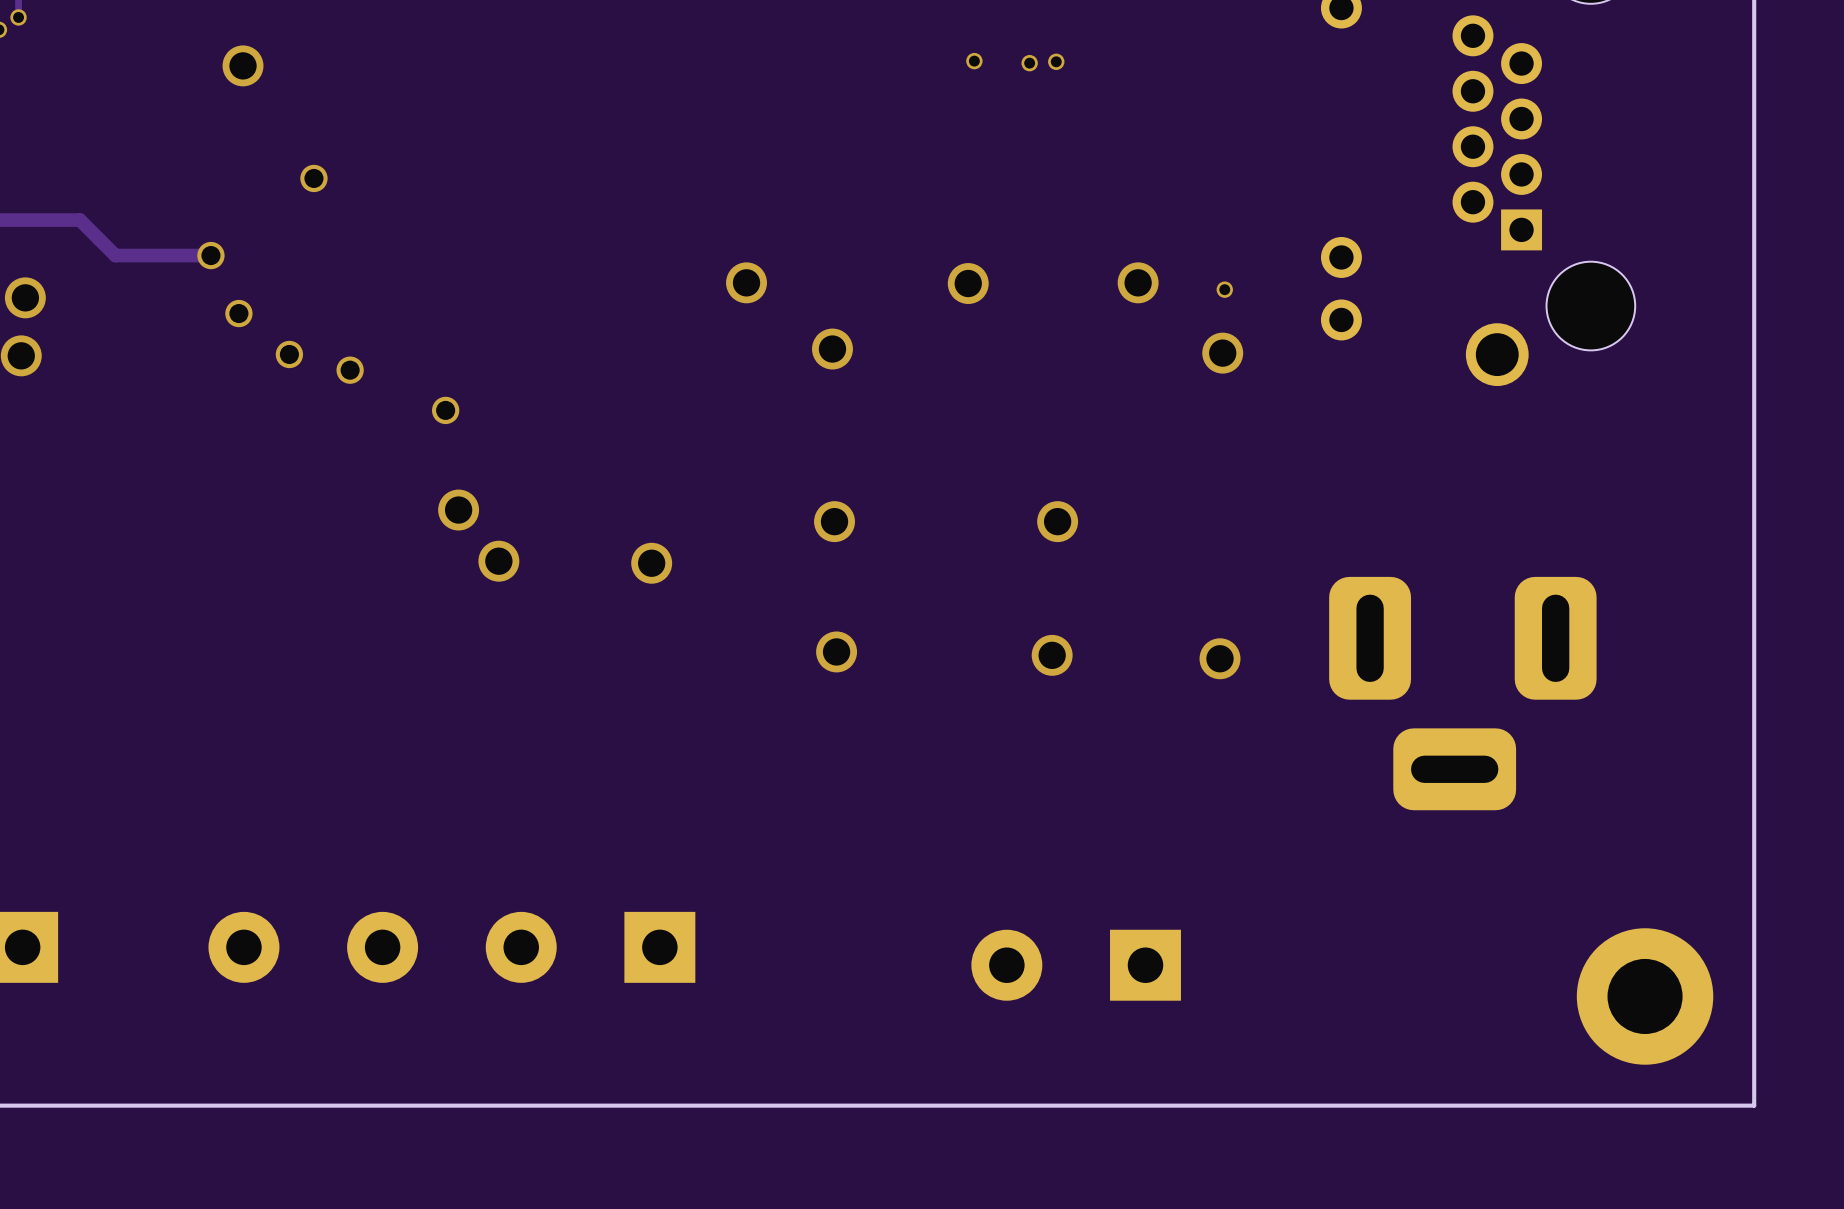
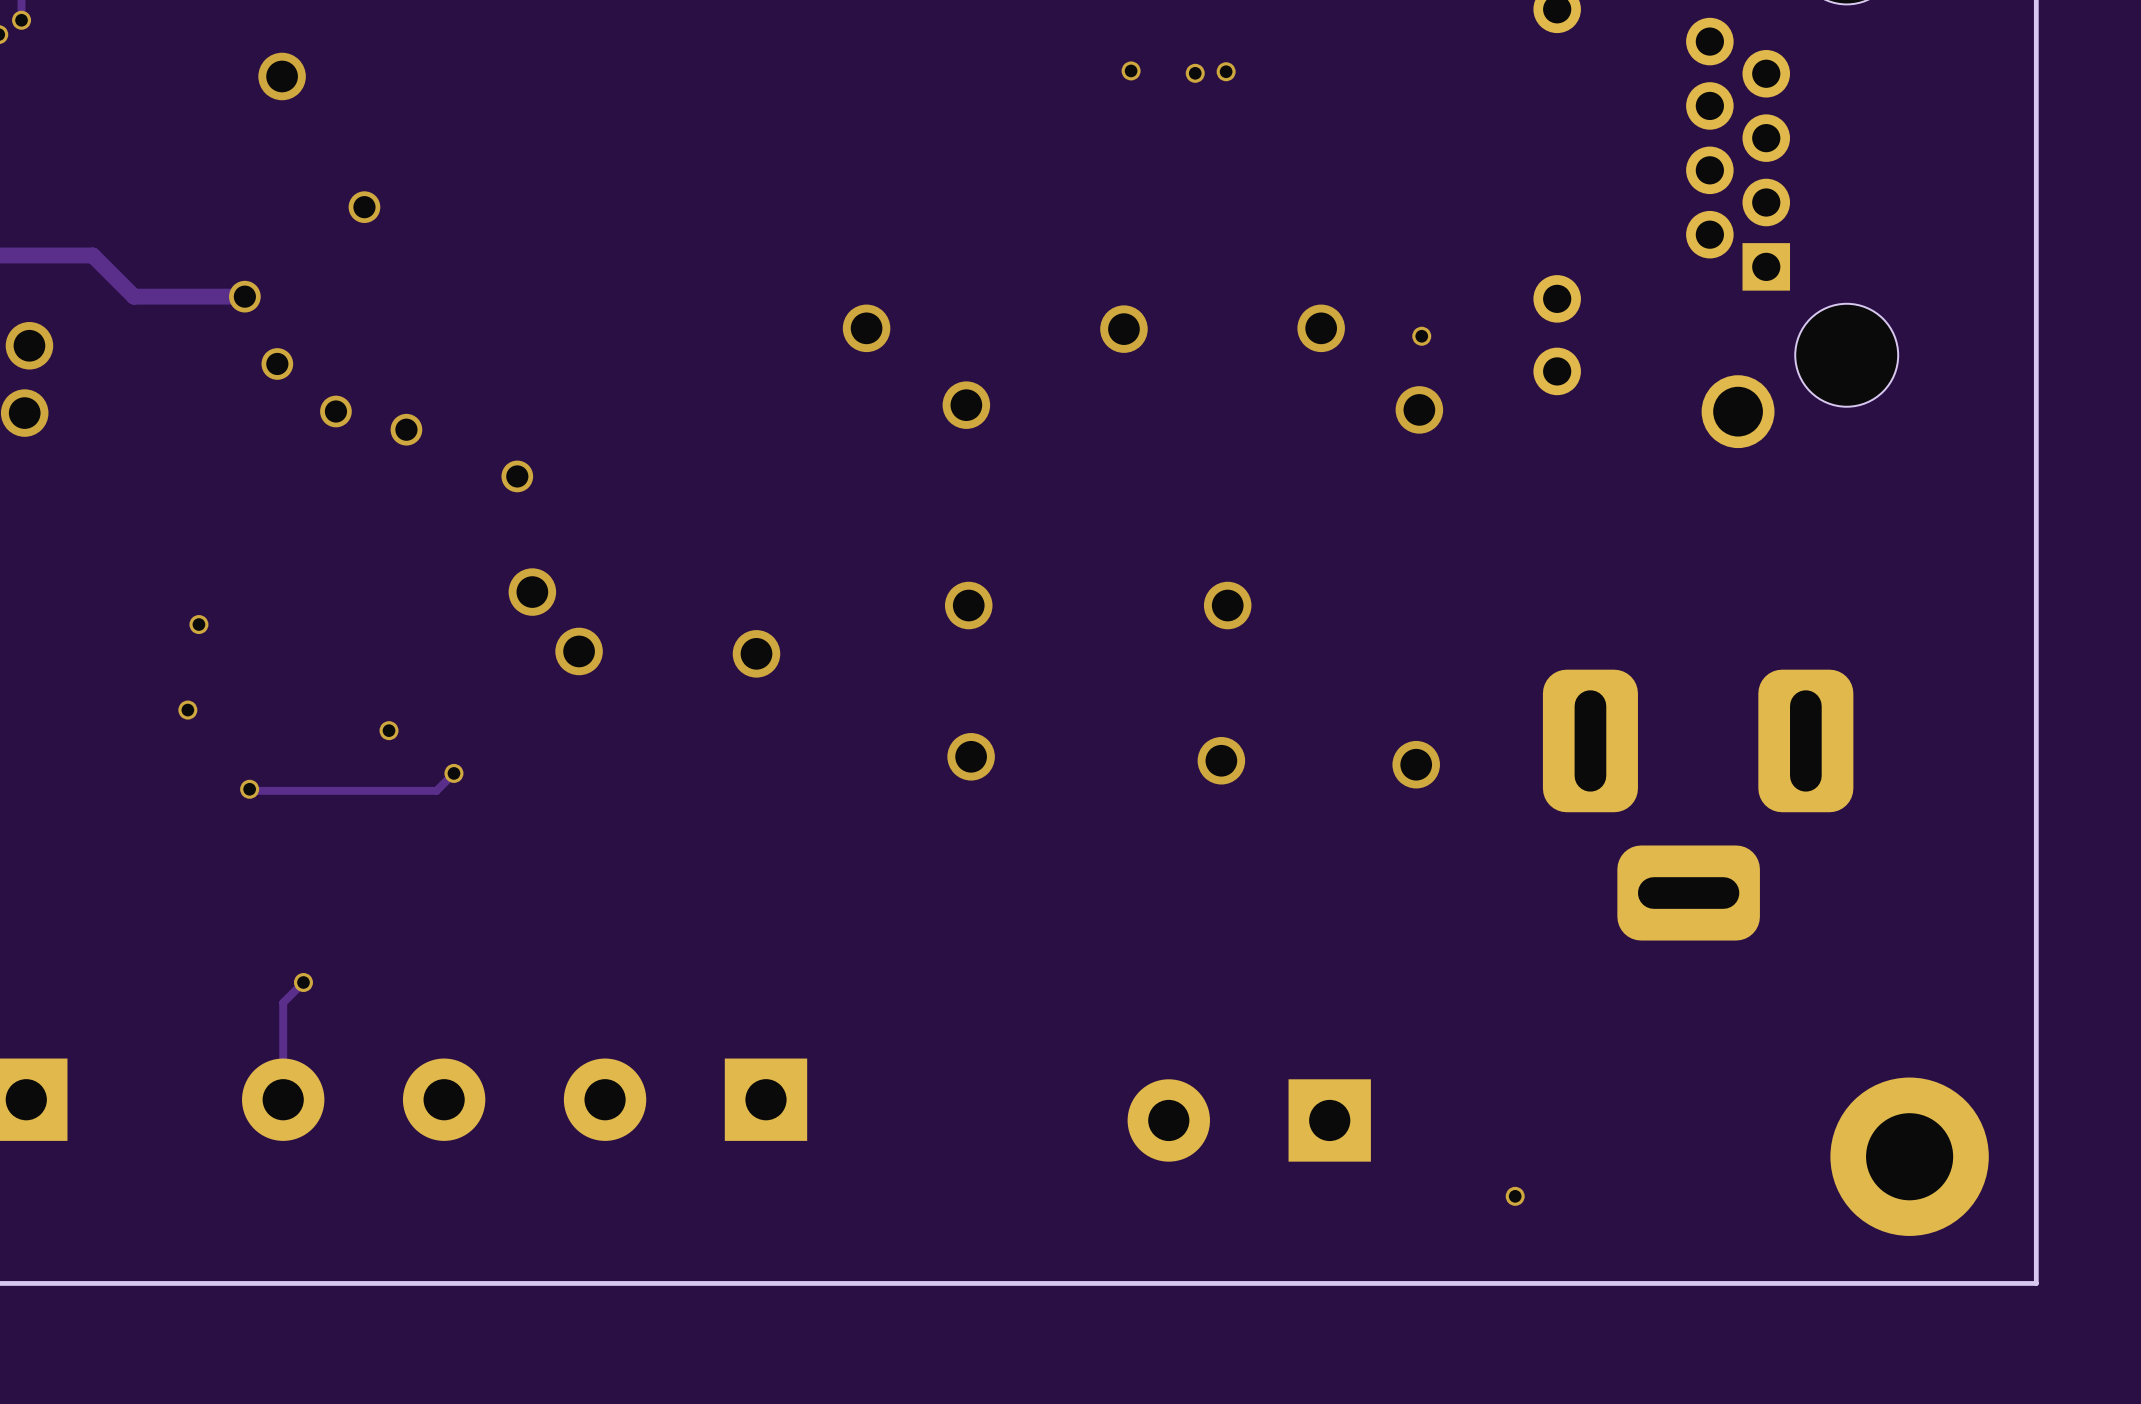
via: none -> (198, 624)
via: none -> (187, 710)
via: none -> (389, 730)
track: none -> (453, 773) (436, 790) (251, 790) (249, 789)
via: none -> (453, 773)
via: none -> (249, 789)
track: none -> (303, 982) (283, 1002) (283, 1099)
via: none -> (303, 982)
via: none -> (1515, 1196)

